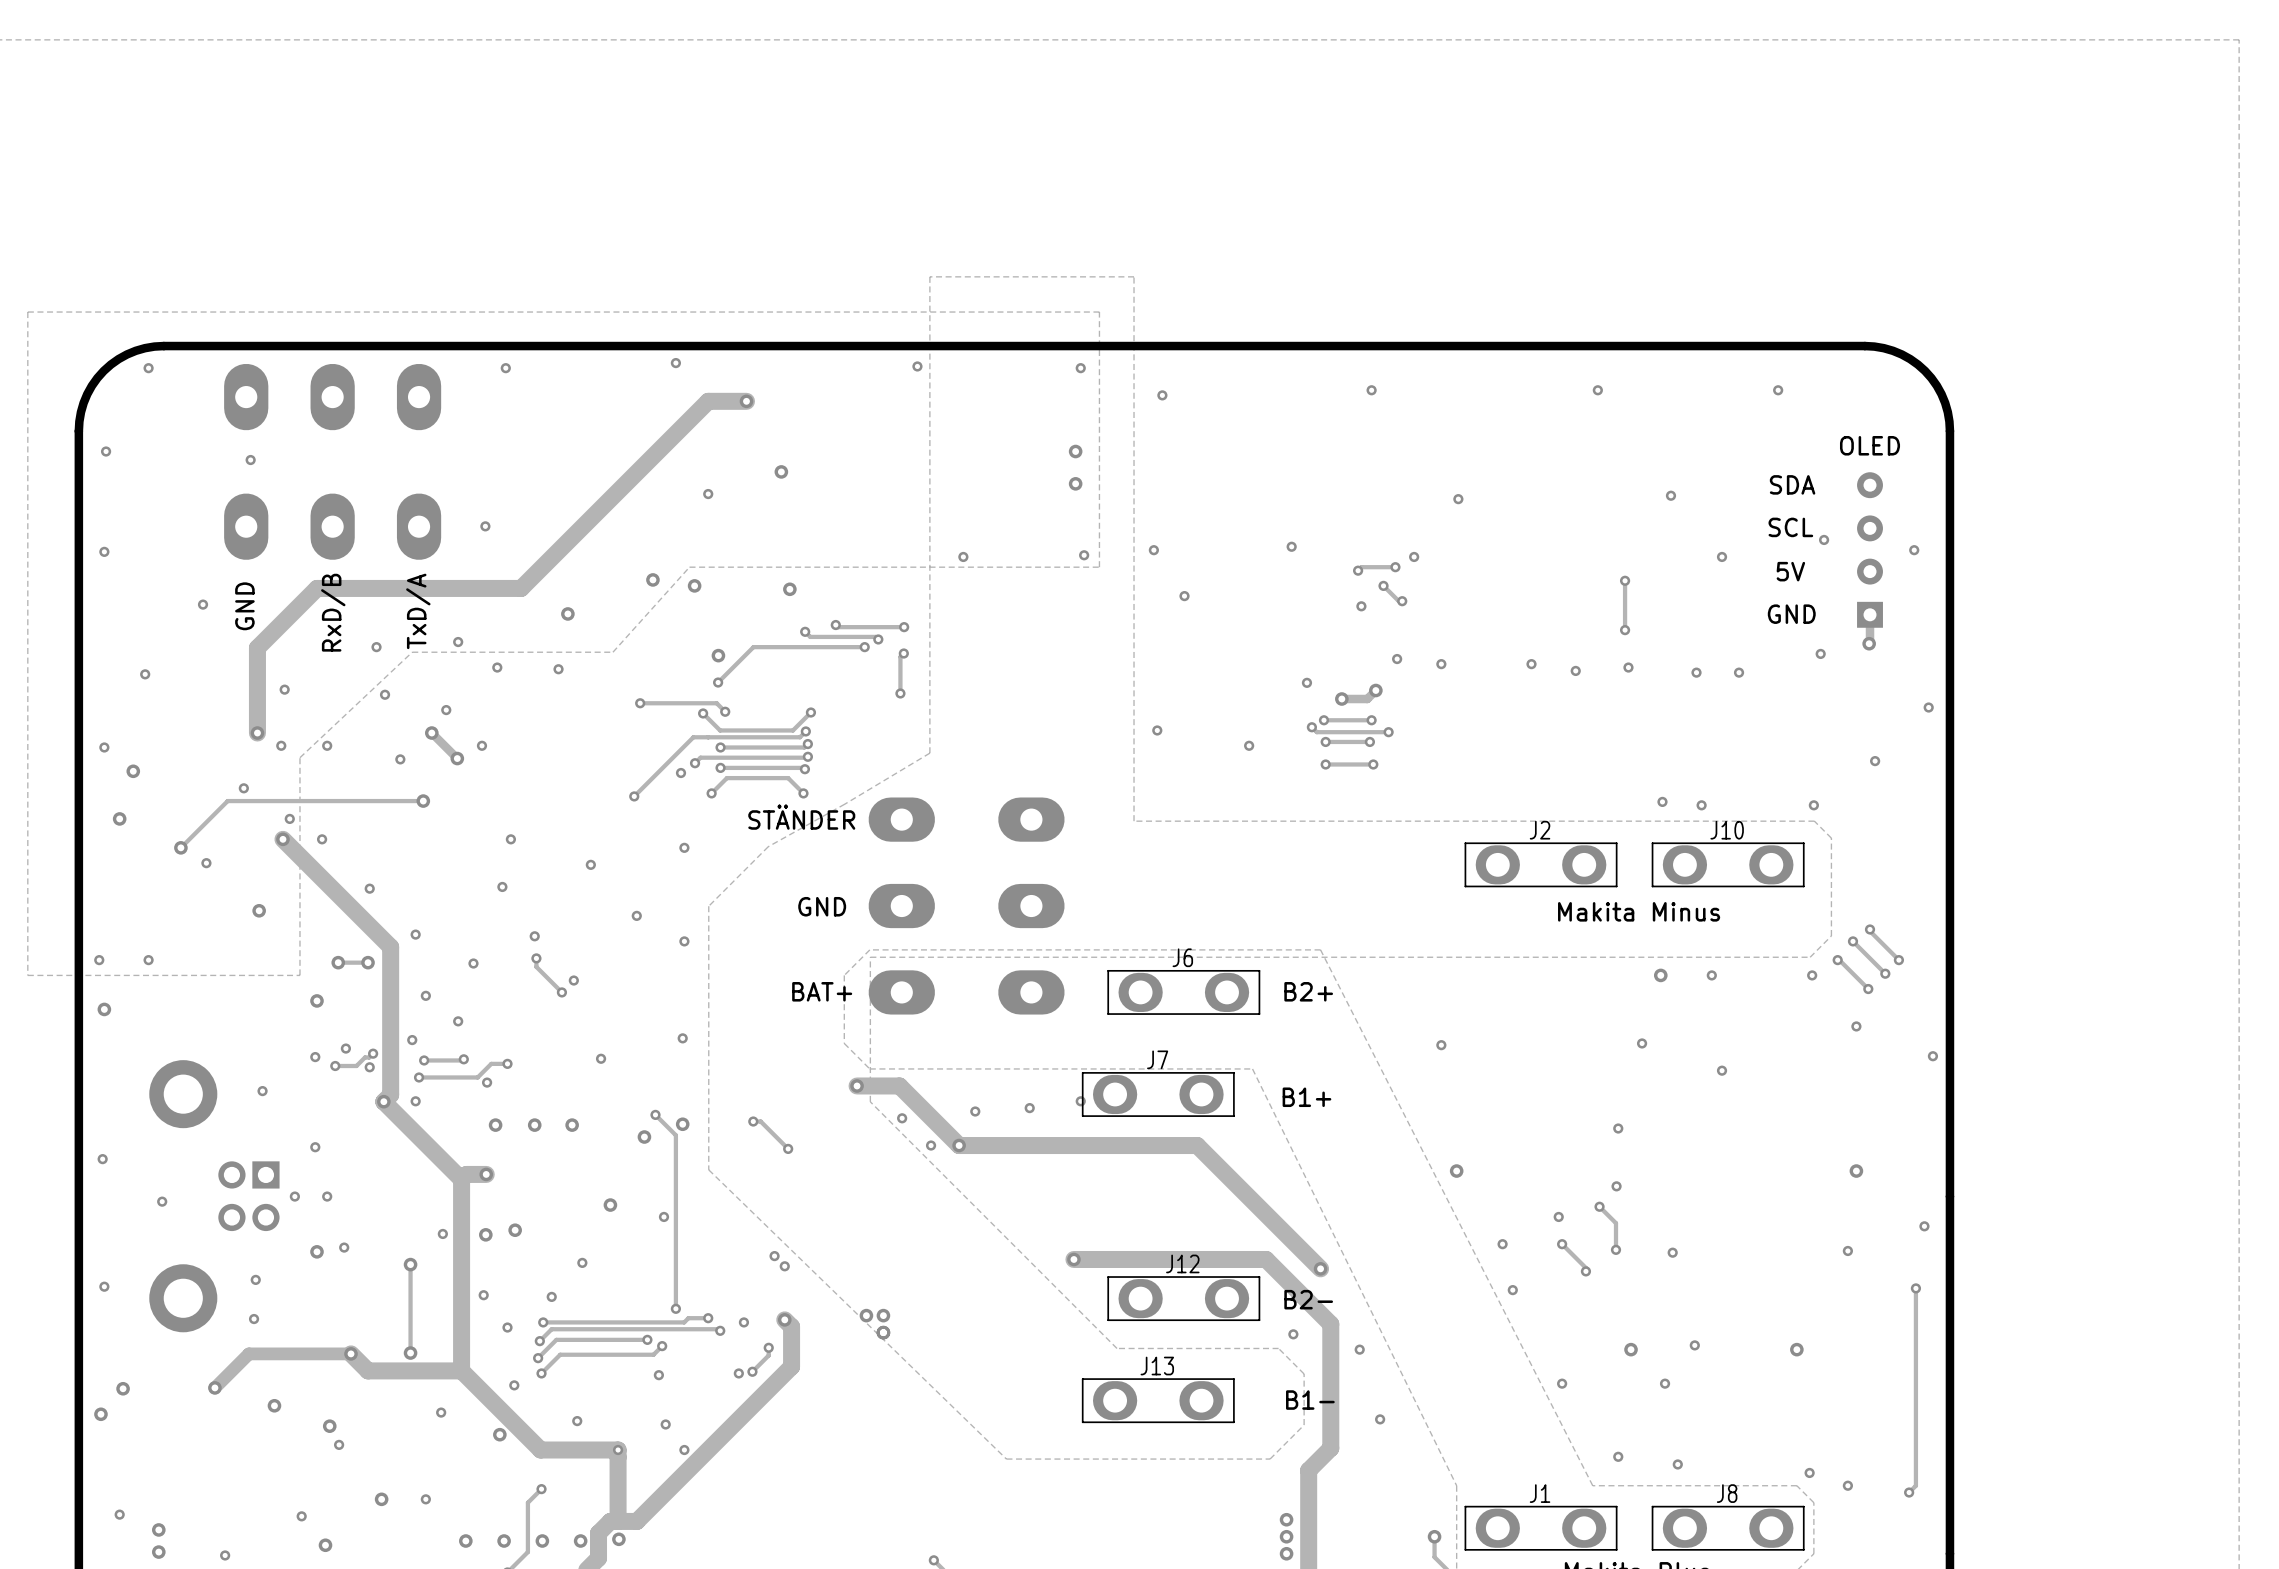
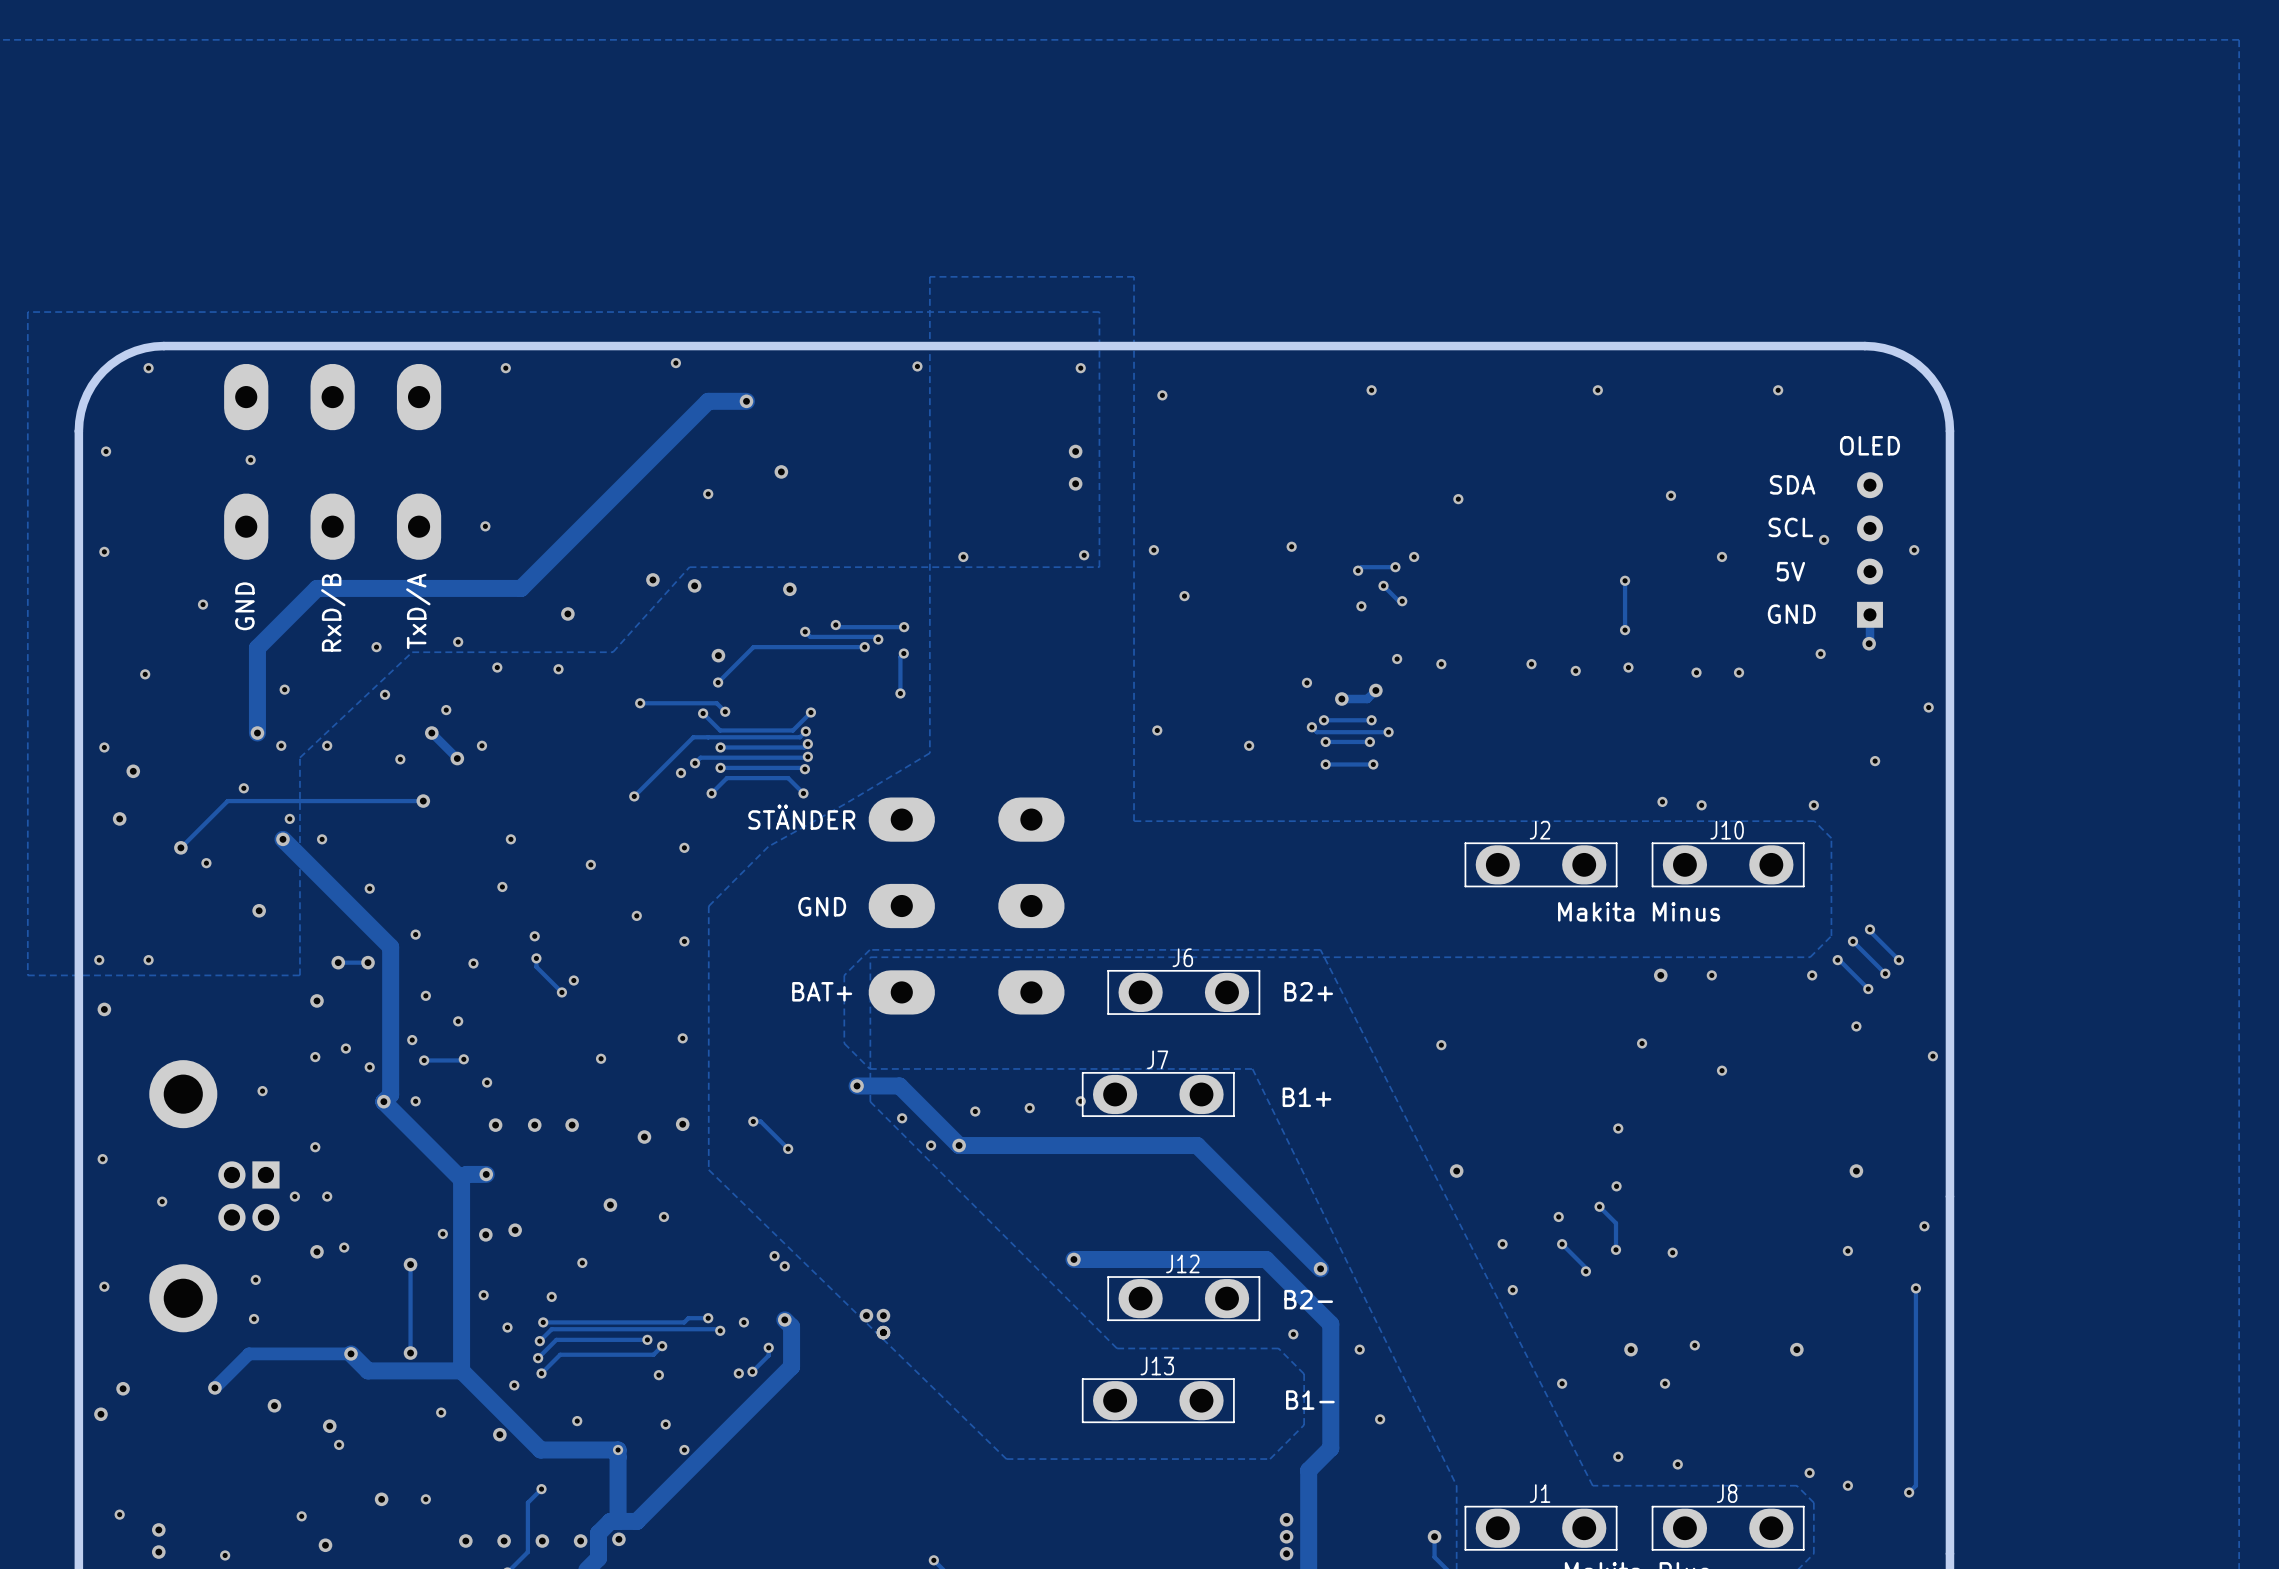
track: (373, 1053) (369, 1057) (365, 1057) (356, 1066) (335, 1066) -> none
via: (373, 1053) -> none
track: (507, 1063) (491, 1063) (477, 1077) (419, 1077) -> none
via: (507, 1063) -> none
via: (335, 1066) -> none
via: (419, 1077) -> none
track: (655, 1114) (675, 1135) (675, 1308) -> none
via: (655, 1114) -> none
via: (675, 1308) -> none

